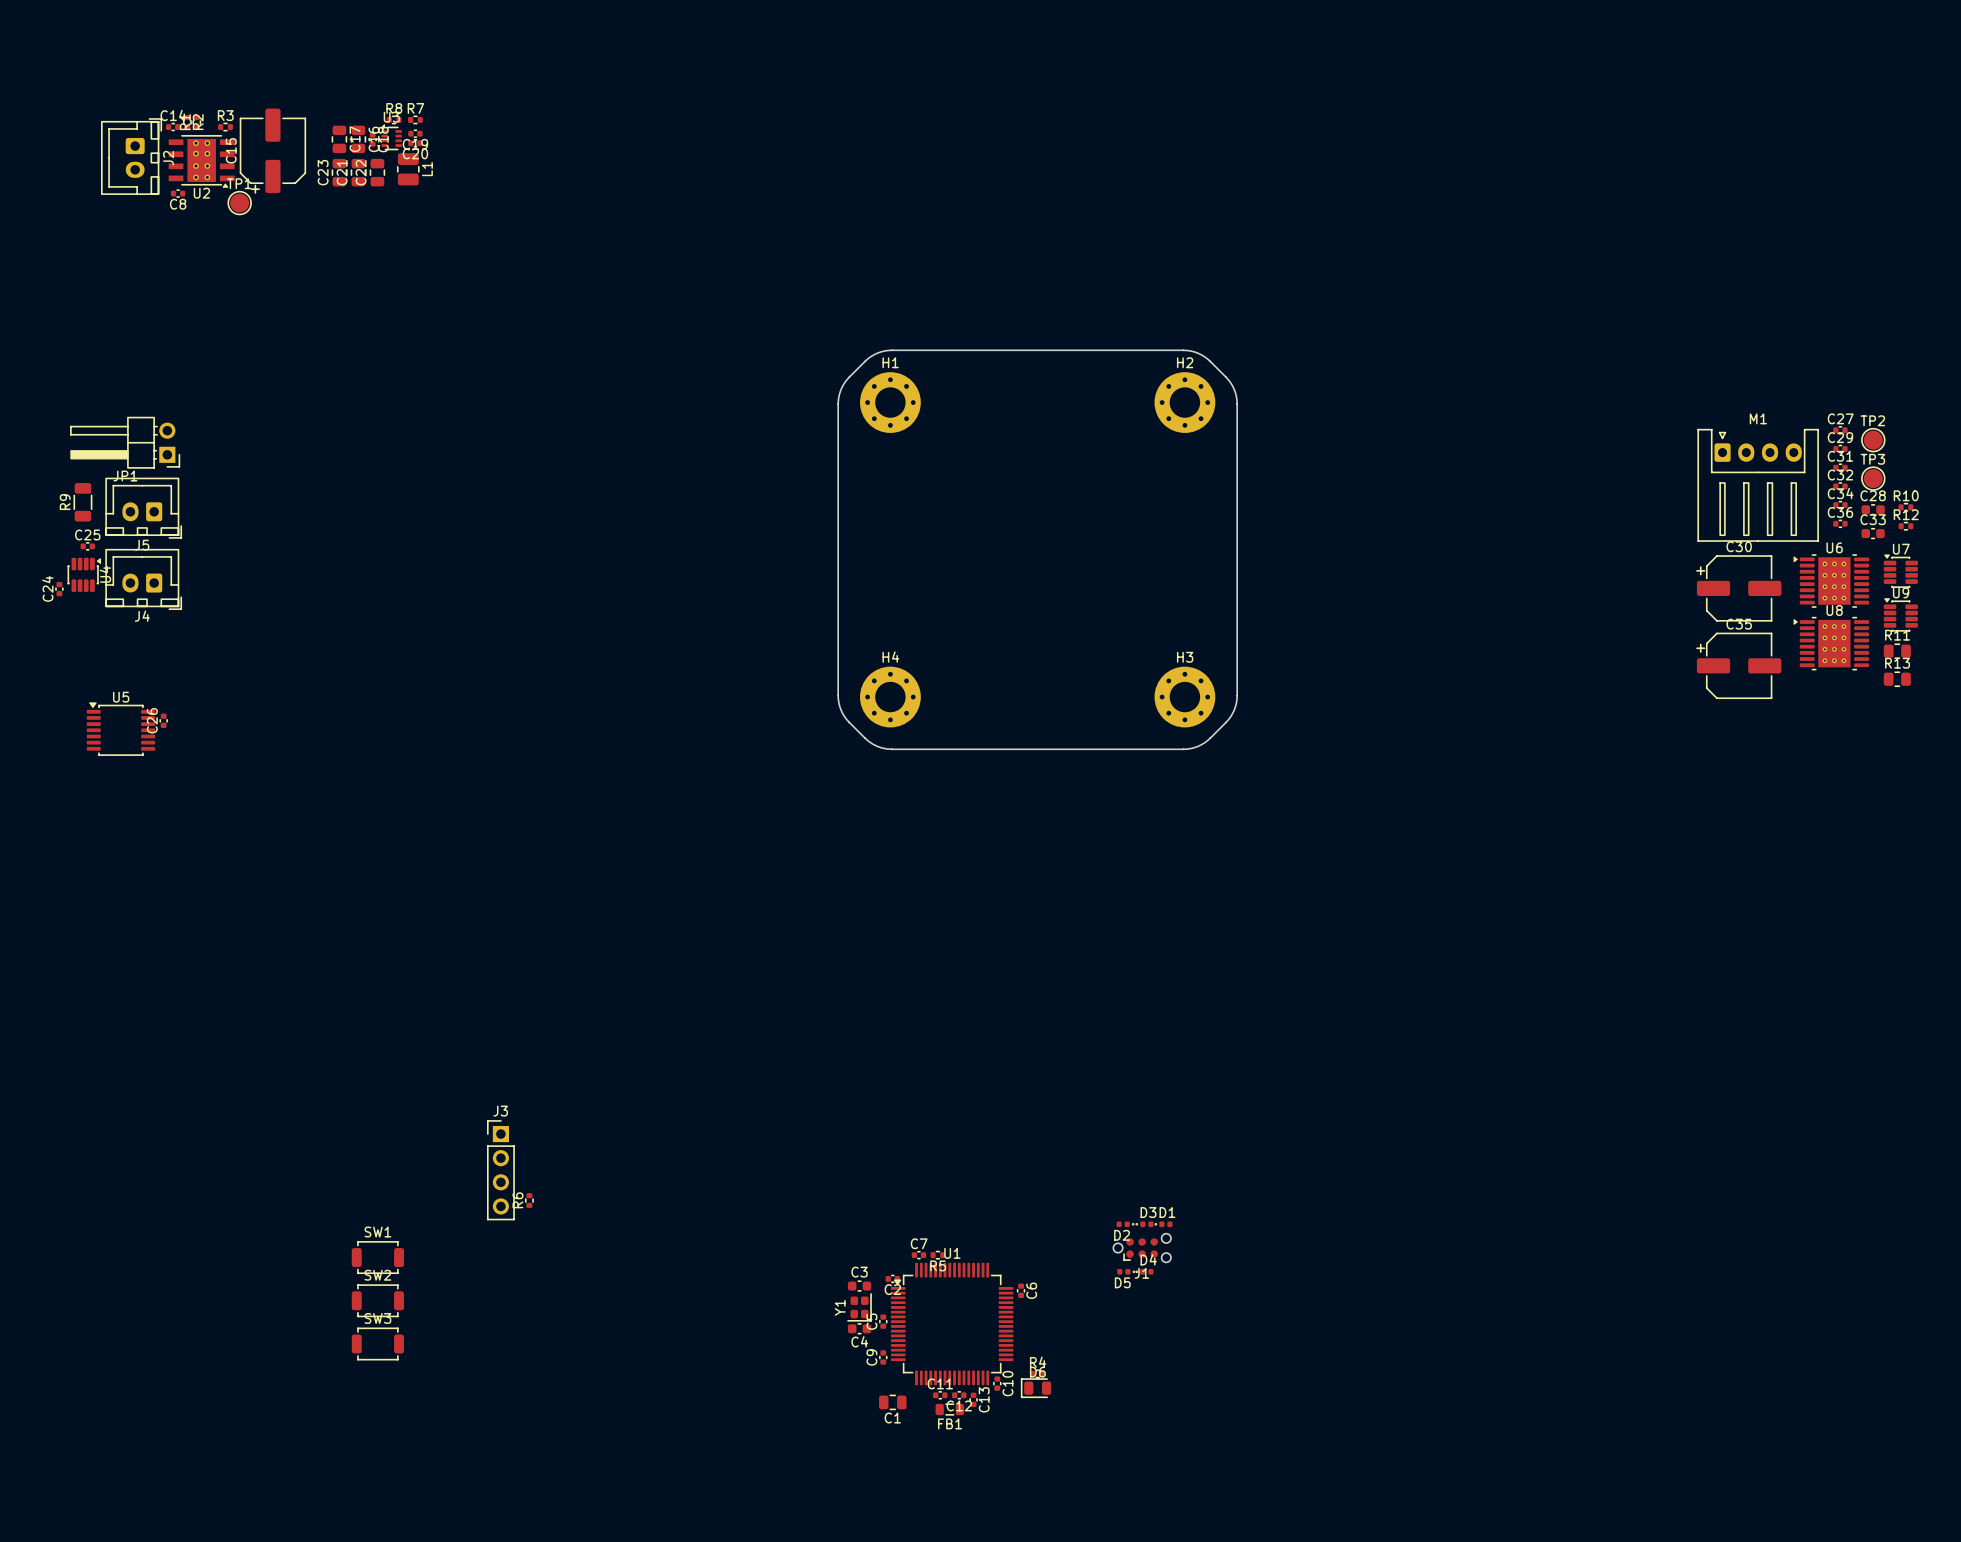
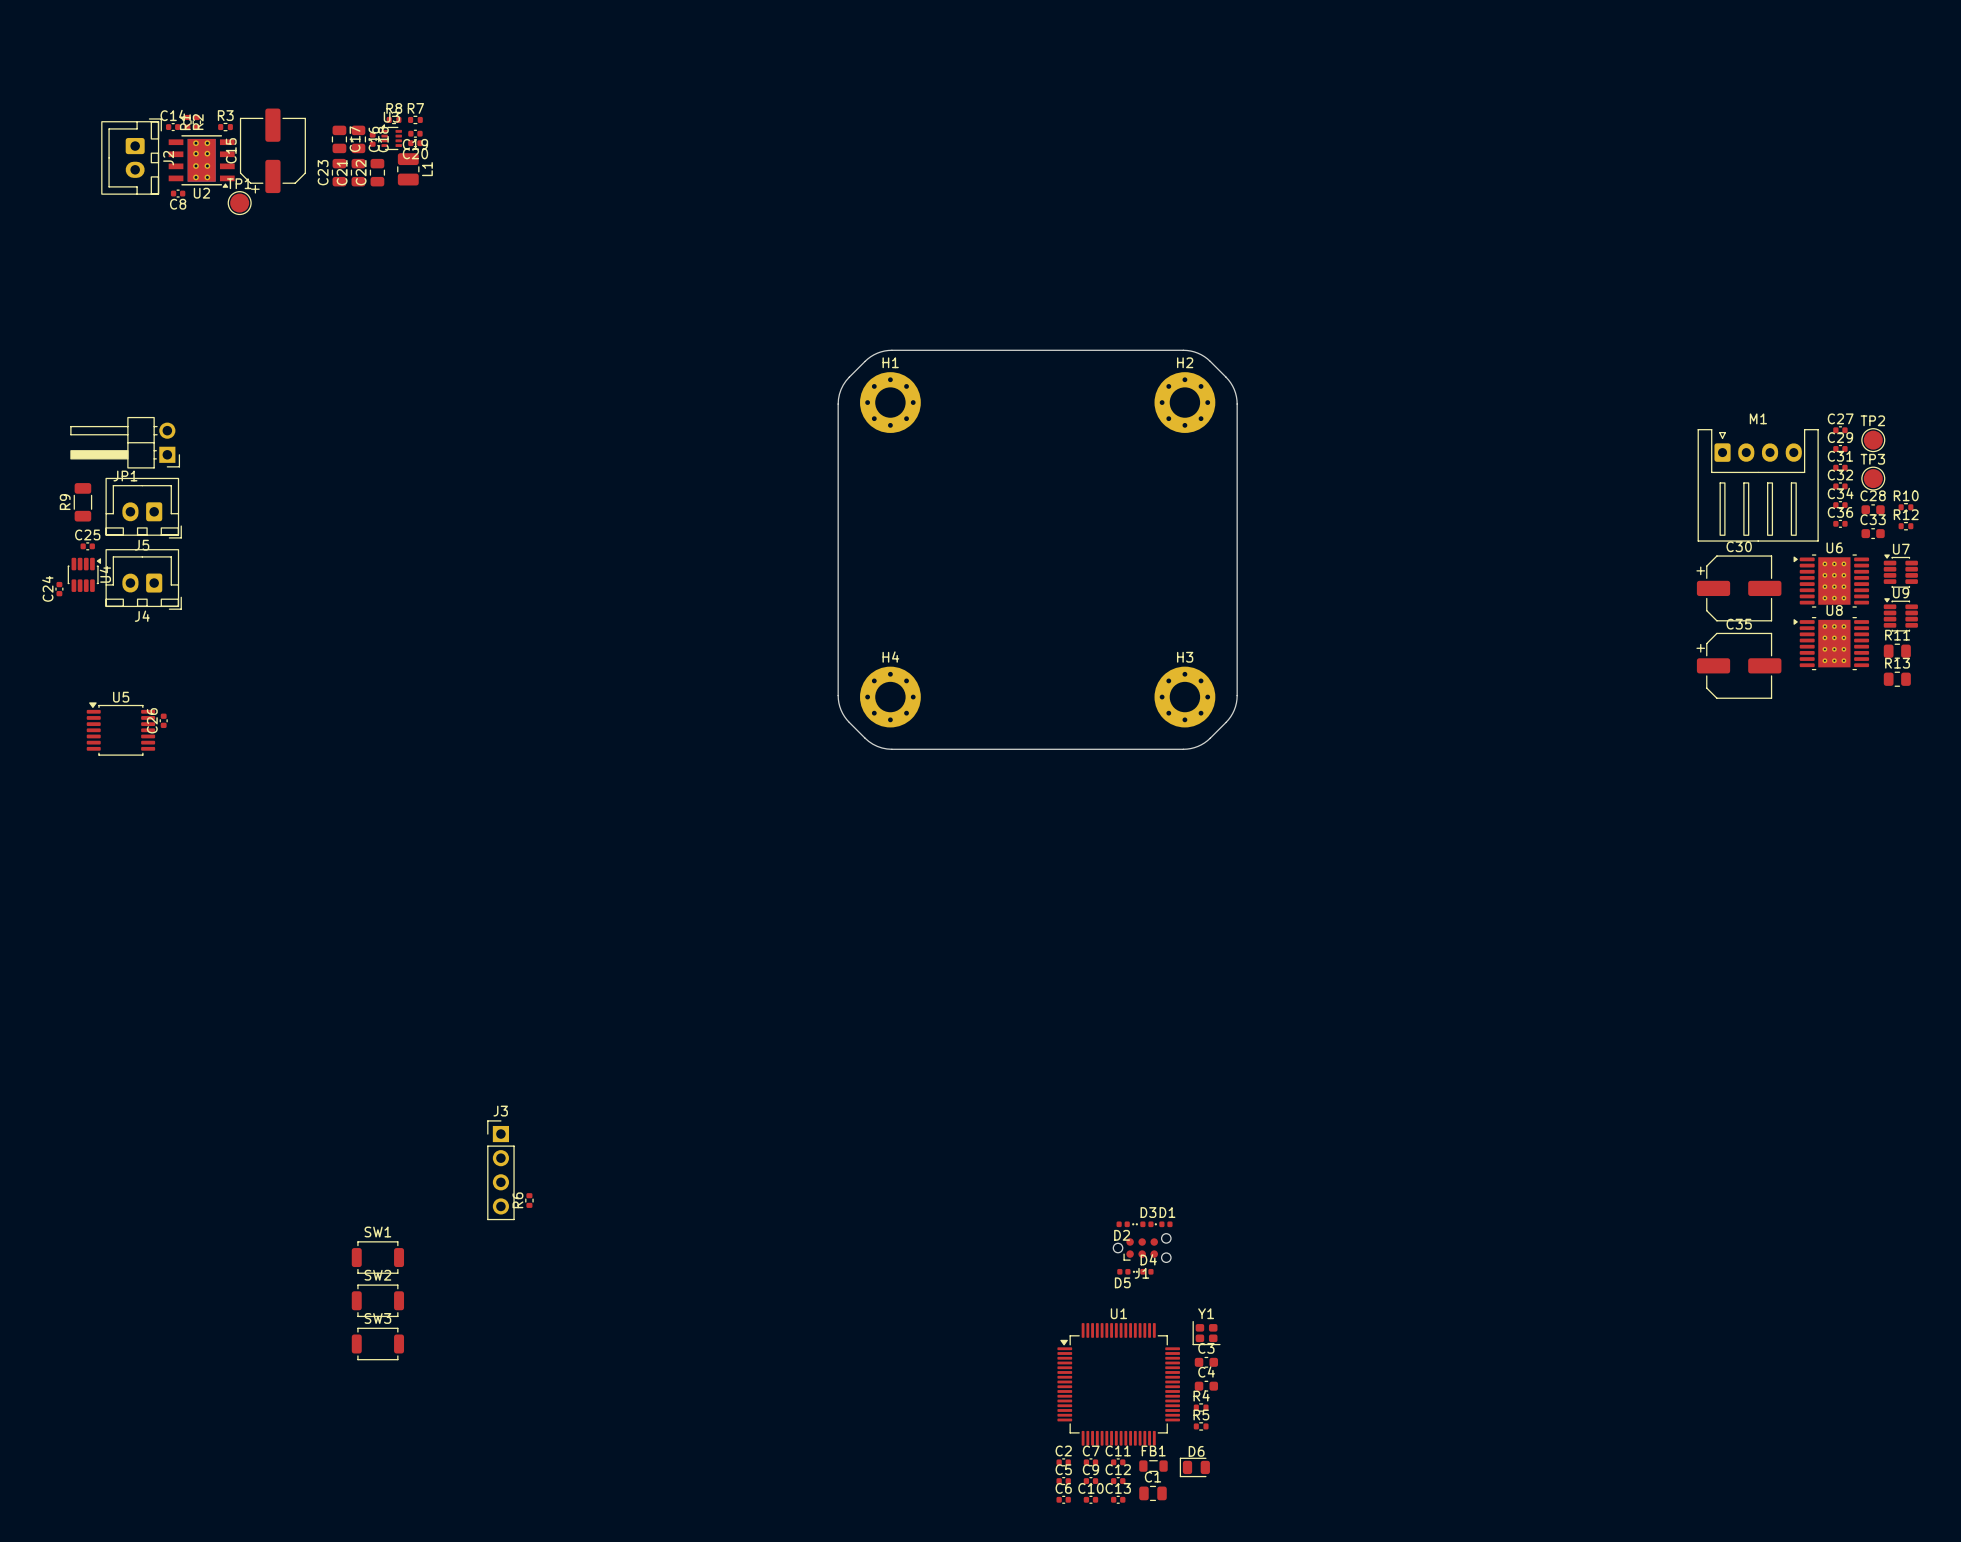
C7 position: (918, 1255) -> (1090, 1462)
R5 position: (937, 1255) -> (1201, 1426)
R5 name position: R5 (938, 1265) -> R5 (1201, 1414)
C2 position: (892, 1278) -> (1063, 1462)
C3 position: (859, 1286) -> (1206, 1362)
C2 name position: C2 (892, 1289) -> C2 (1063, 1450)
C6 rotation: 0° (1021, 1290) -> 90° clockwise (1063, 1499)
C6 position: (1021, 1290) -> (1063, 1499)
Y1 rotation: 0° (859, 1307) -> 90° clockwise (1206, 1333)
Y1 position: (859, 1307) -> (1206, 1333)
C5 rotation: 0° (883, 1321) -> 90° clockwise (1063, 1481)
C5 position: (883, 1321) -> (1063, 1481)
U1 position: (952, 1324) -> (1118, 1384)
C4 position: (859, 1328) -> (1206, 1386)
C4 name position: C4 (859, 1341) -> C4 (1206, 1372)
C9 rotation: 0° (883, 1357) -> 90° clockwise (1090, 1481)
C9 position: (883, 1357) -> (1090, 1481)
R4 position: (1037, 1373) -> (1201, 1407)
C10 rotation: 0° (997, 1383) -> 90° clockwise (1090, 1499)
C10 position: (997, 1383) -> (1090, 1499)
D6 position: (1036, 1388) -> (1194, 1467)
C11 position: (940, 1395) -> (1118, 1462)
C12 position: (959, 1395) -> (1118, 1481)
C13 rotation: 0° (973, 1399) -> 90° clockwise (1118, 1499)
C13 position: (973, 1399) -> (1118, 1499)
C1 position: (892, 1402) -> (1152, 1493)
C12 name position: C12 (959, 1405) -> C12 (1118, 1469)
FB1 position: (949, 1409) -> (1153, 1466)
C1 name position: C1 (892, 1418) -> C1 (1152, 1477)
FB1 name position: FB1 (950, 1423) -> FB1 (1153, 1450)

